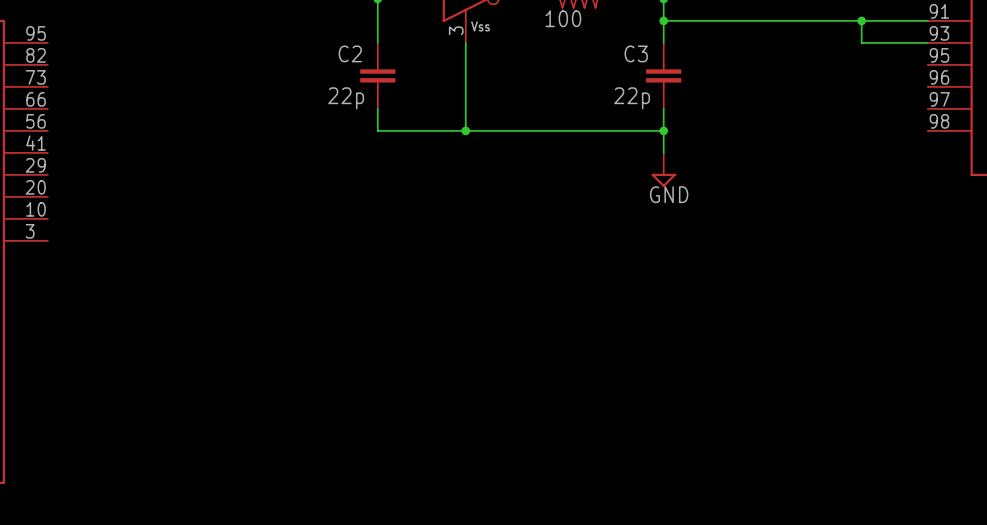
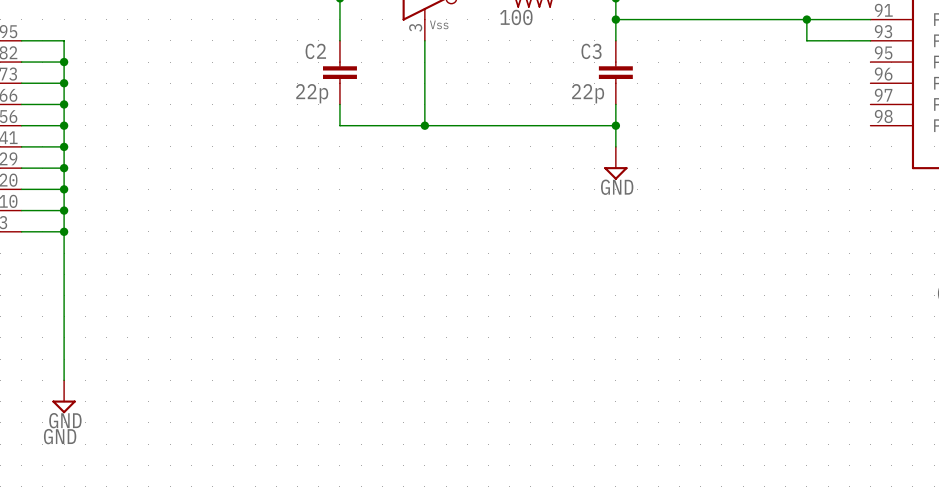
wire: none -> (21, 40) (64, 40) (64, 380)
wire: none -> (21, 62) (64, 62)
junction: none -> (64, 62)
wire: none -> (21, 83) (64, 83)
junction: none -> (64, 83)
wire: none -> (21, 104) (64, 104)
junction: none -> (64, 104)
wire: none -> (21, 125) (64, 125)
junction: none -> (64, 125)
wire: none -> (21, 146) (64, 146)
junction: none -> (64, 146)
wire: none -> (21, 168) (64, 168)
junction: none -> (64, 168)
wire: none -> (21, 189) (64, 189)
junction: none -> (64, 189)
wire: none -> (21, 210) (64, 210)
junction: none -> (64, 210)
wire: none -> (21, 231) (64, 231)
junction: none -> (64, 231)
power symbol: none -> GND (64, 396)
label: none -> GND (60, 436)

